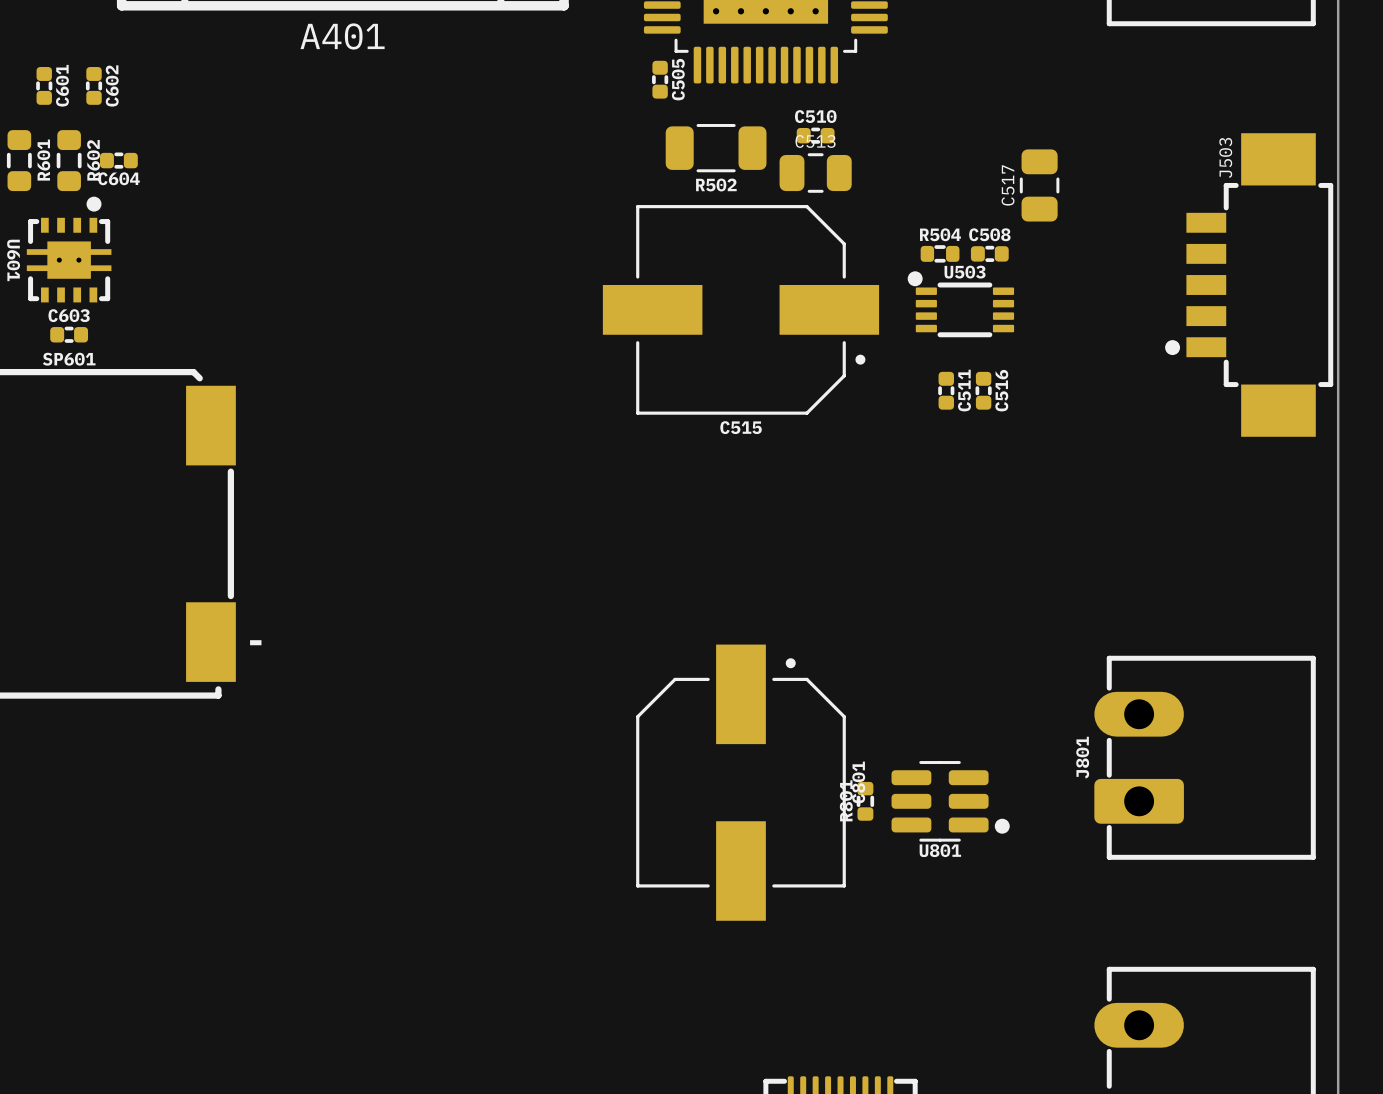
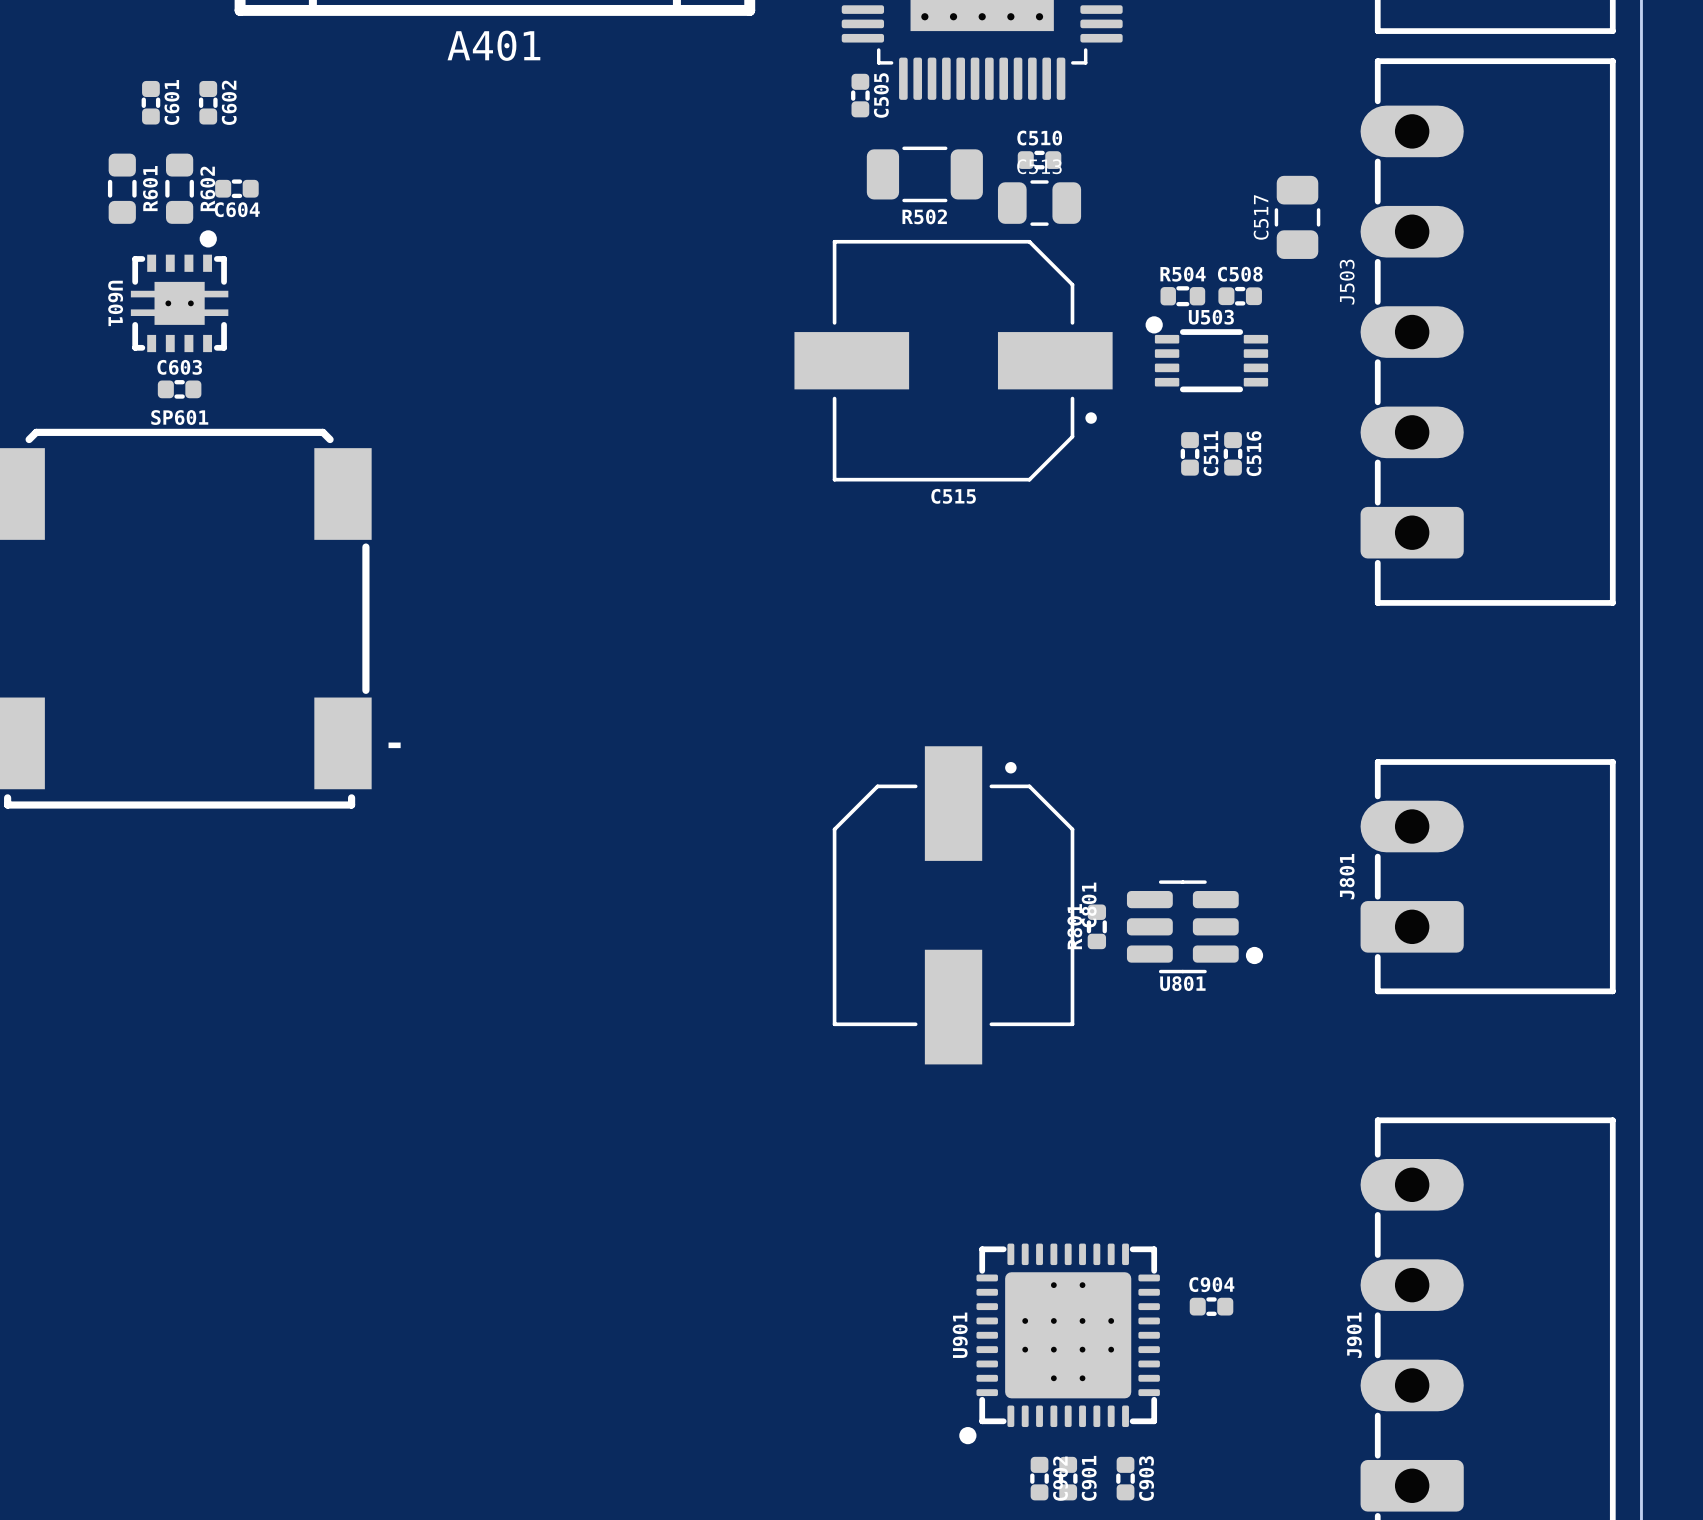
J503 footprint: [1165, 133, 1334, 437] -> [1360, 58, 1616, 606]
J503 name position: J503 (1225, 157) -> J503 (1347, 282)

